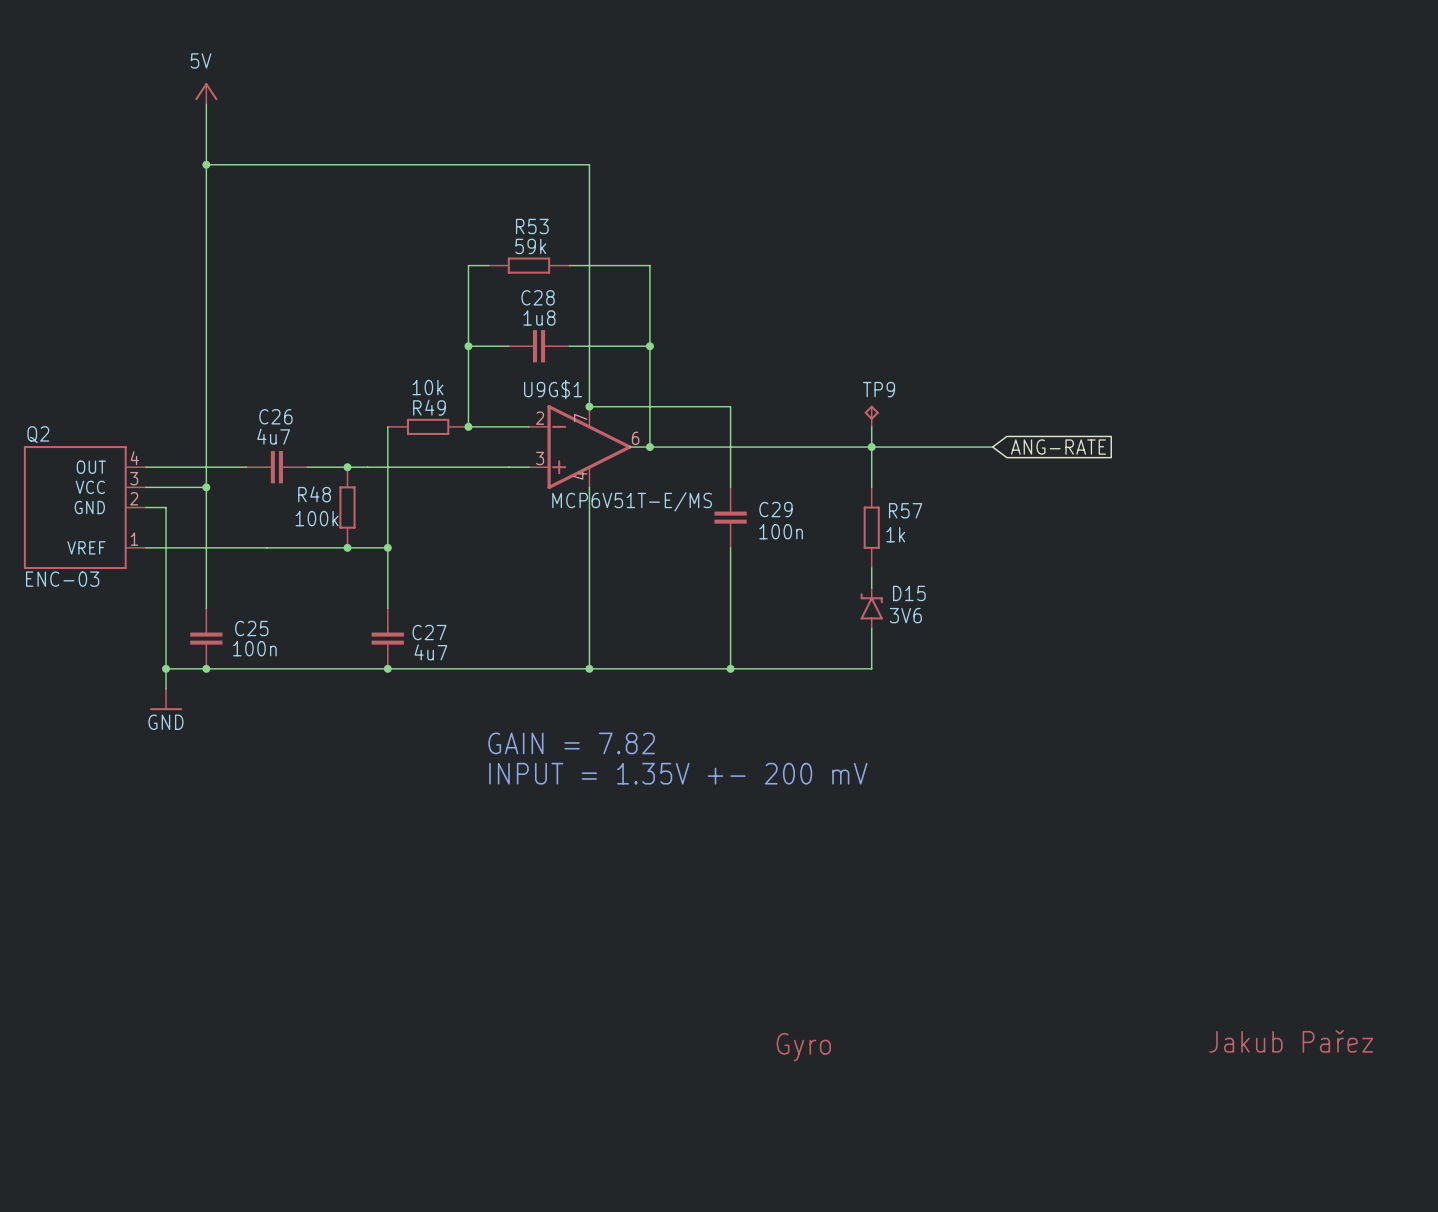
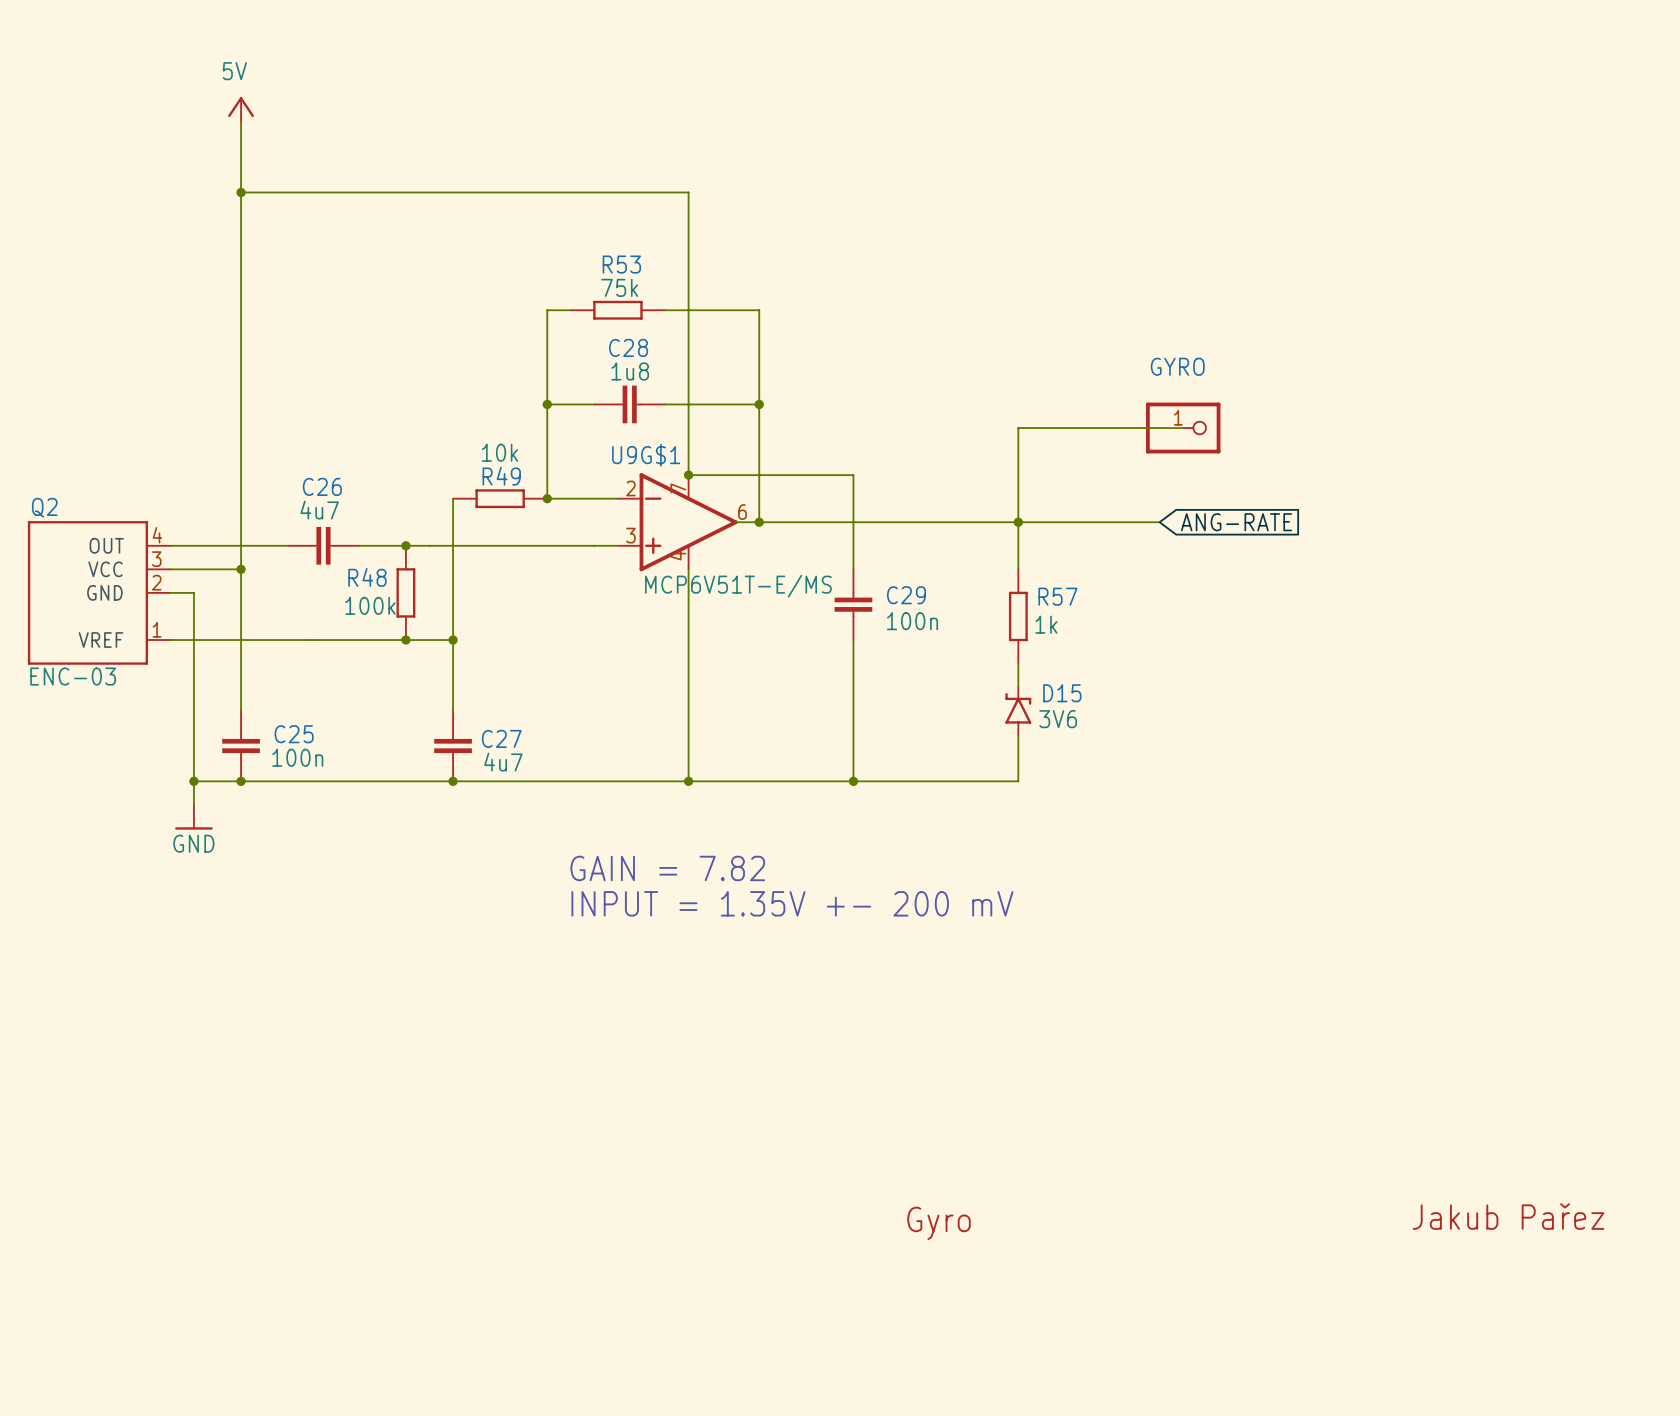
R53 value: 59k (530, 246) -> 75k (619, 287)
wire: none -> (1183, 428) (1018, 428) (1018, 498)
GYRO: none -> (1183, 428)
TP9: (871, 416) -> none

